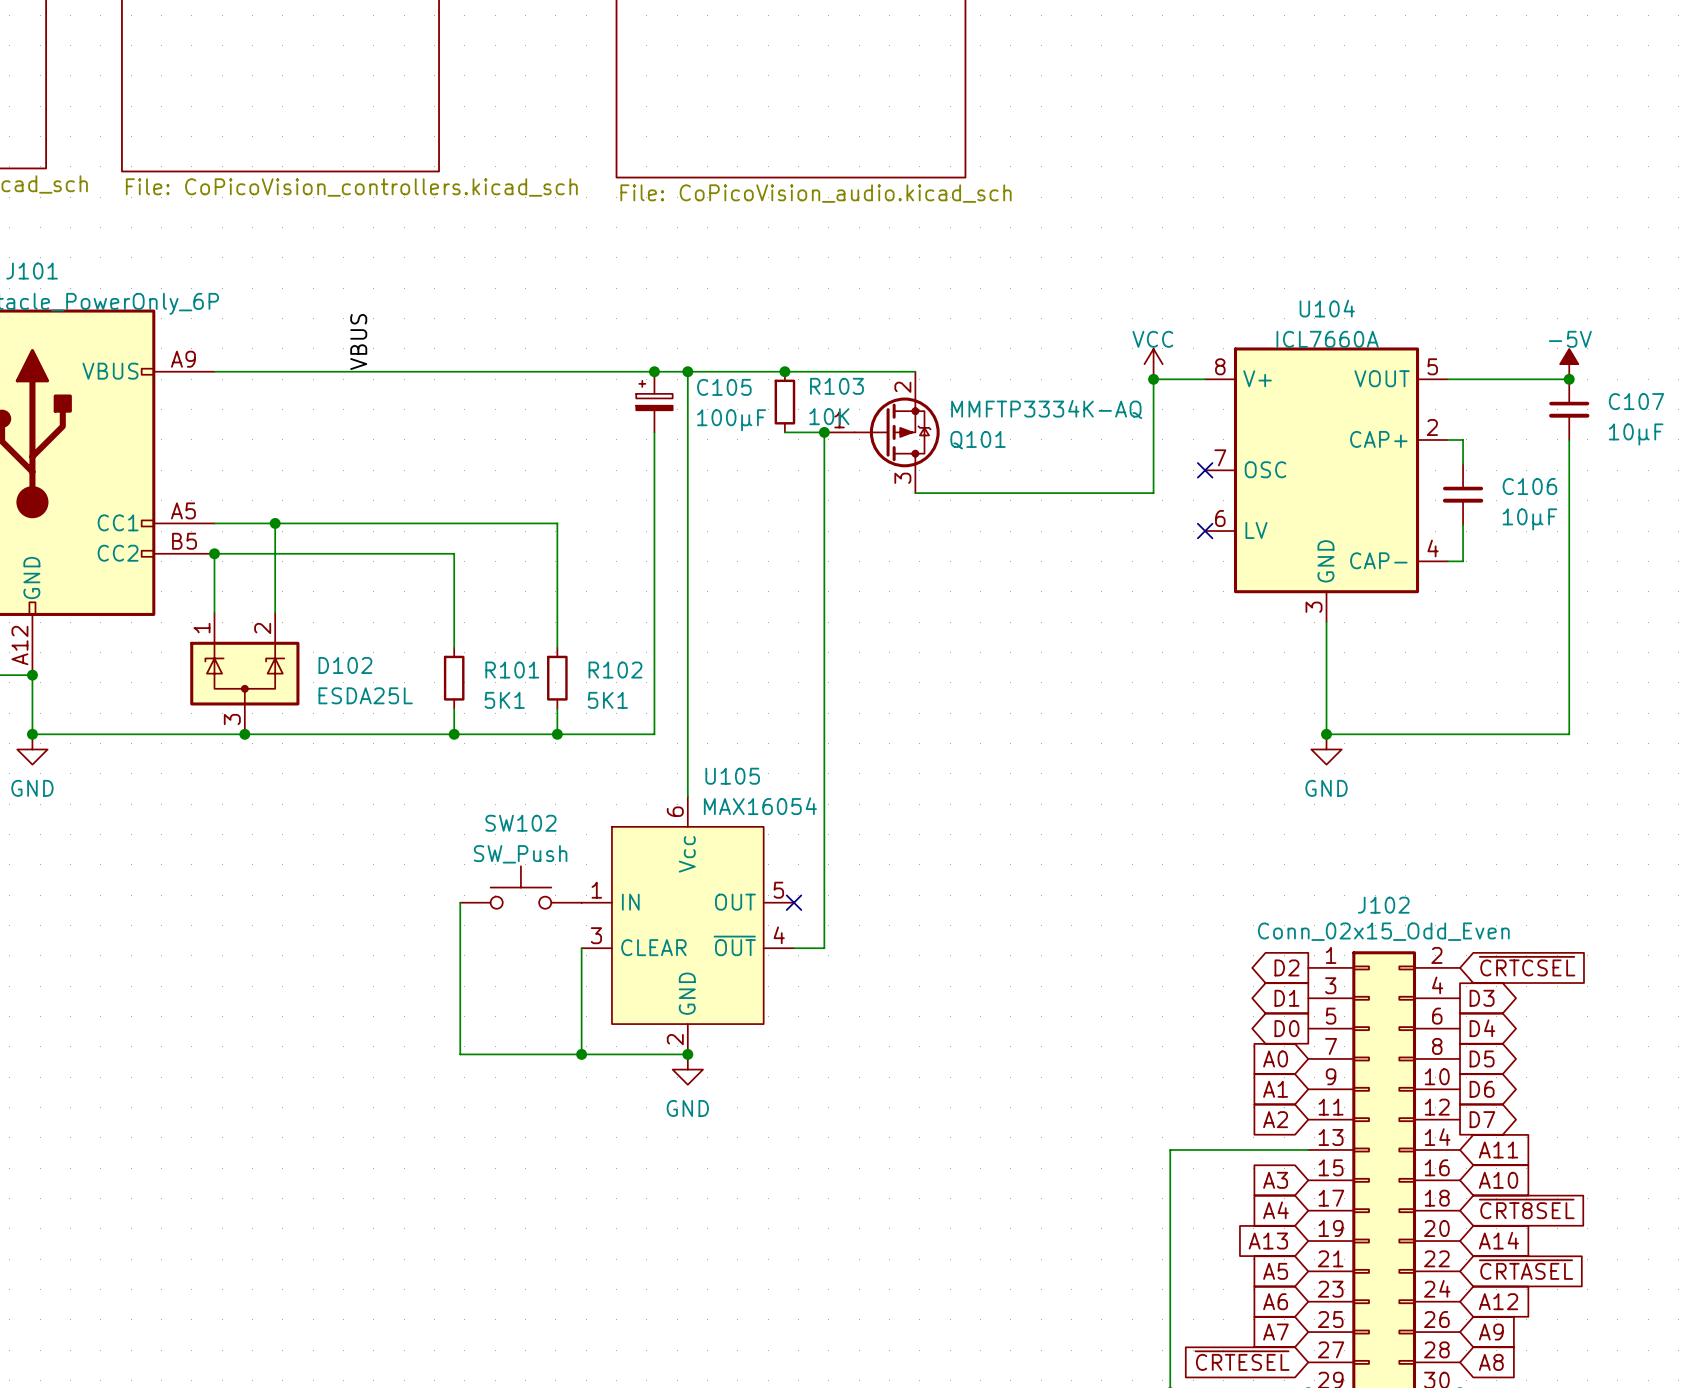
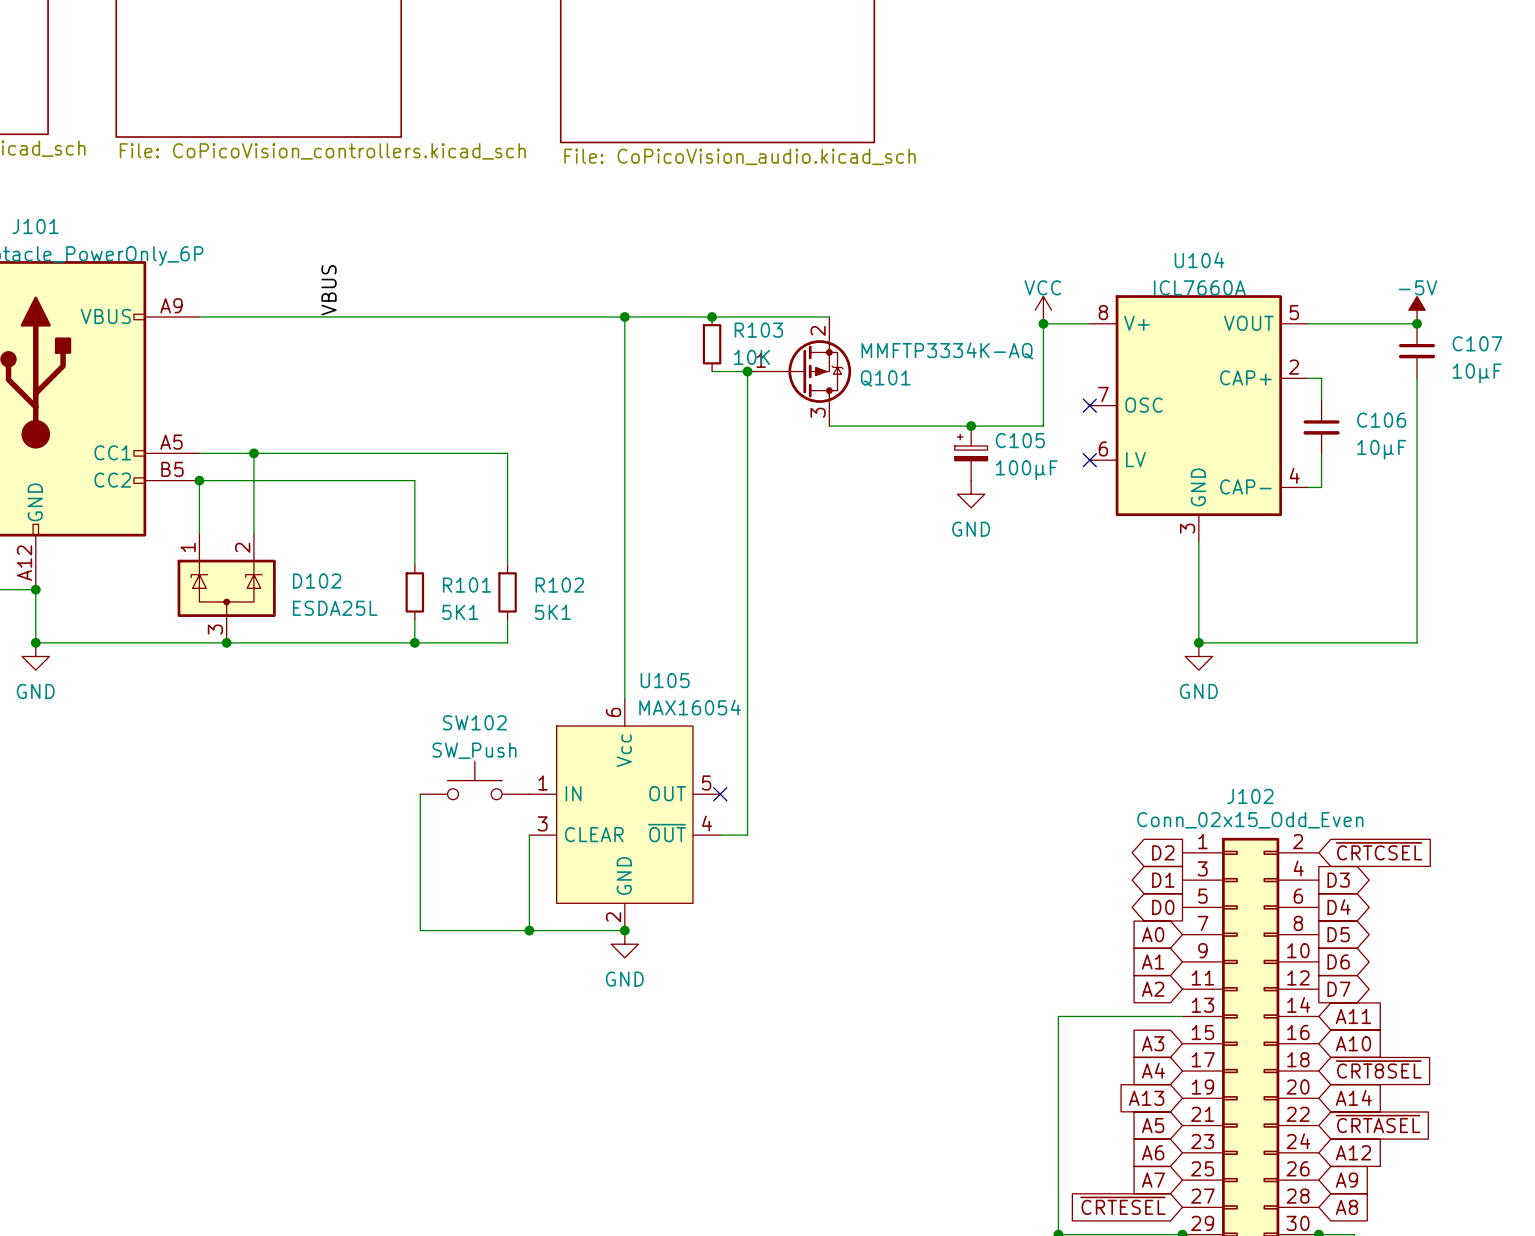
junction: (654, 371) -> none
C105 name position: C105 (724, 387) -> C105 (1020, 440)
C105 position: (654, 402) -> (971, 453)
C105 value position: 100µF (731, 420) -> 100µF (1026, 470)
wire: (654, 432) (654, 734) (557, 734) -> none
junction: none -> (971, 426)
power symbol: none -> GND (971, 494)
junction: (557, 734) -> none

